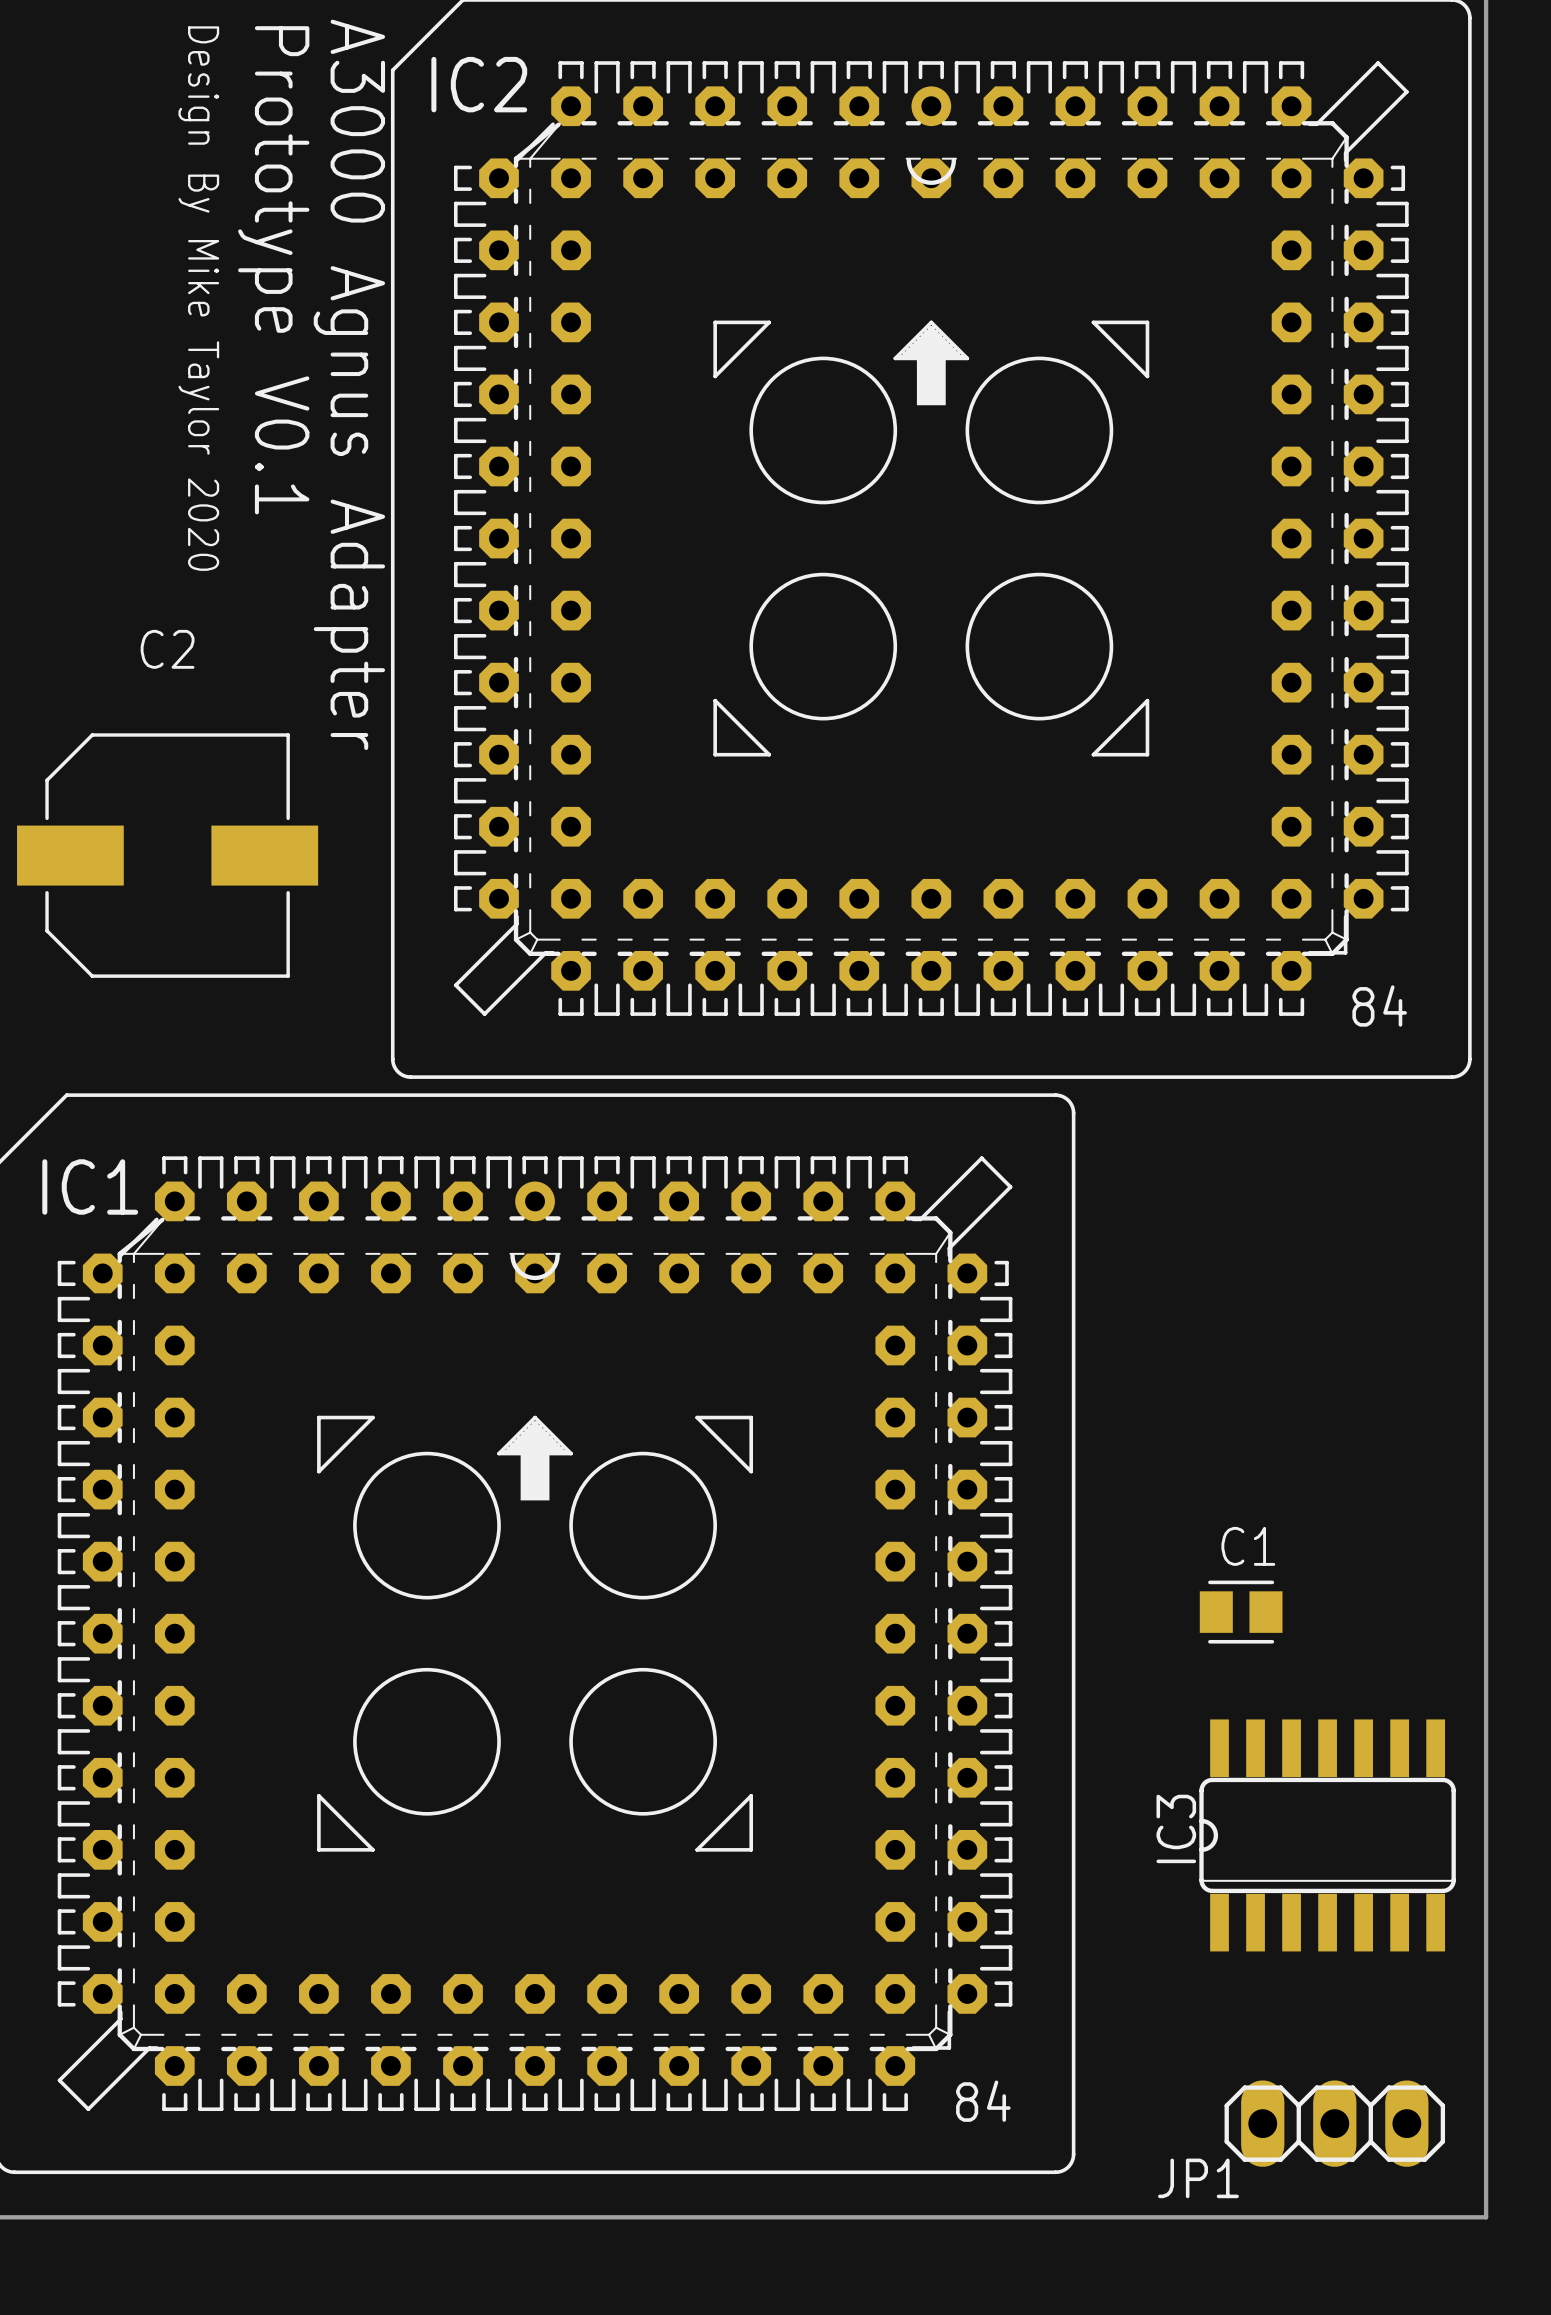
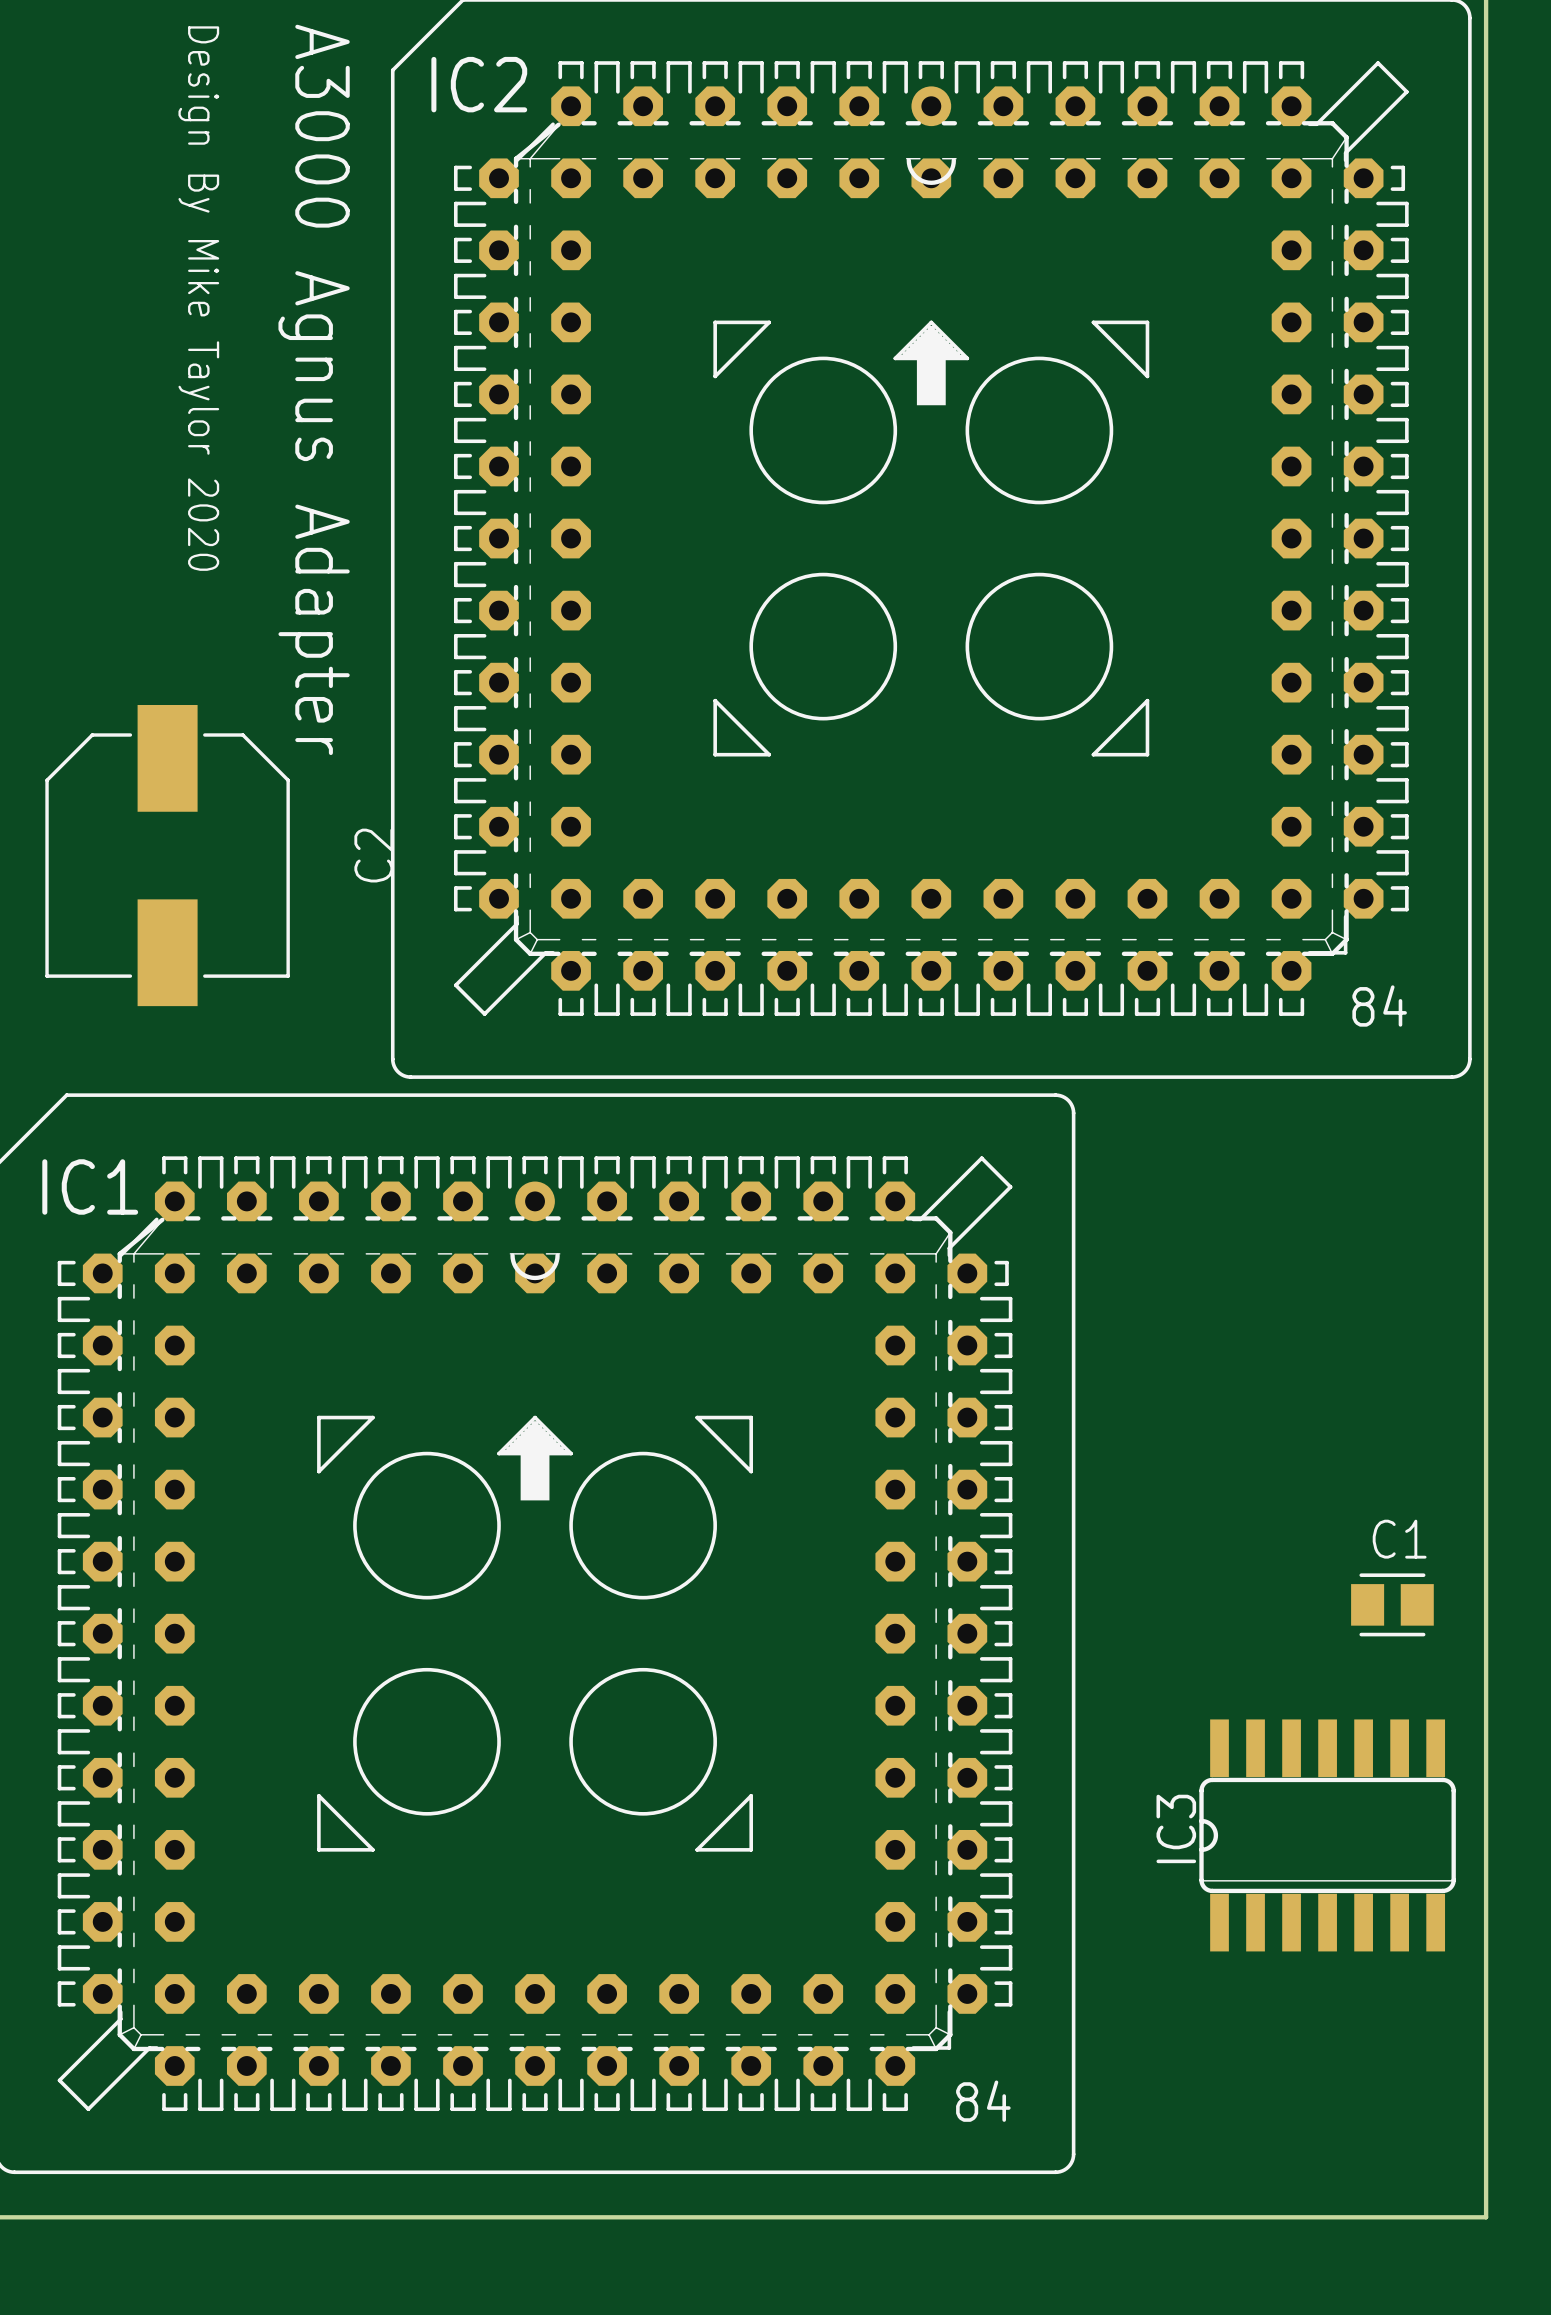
text: Prototype V0.1 (273, 270) -> none
text position: A3000 Agnus Adapter (349, 384) -> A3000 Agnus Adapter (314, 389)
C2 rotation: 0° (167, 855) -> 90° clockwise (167, 855)
C1 position: (1241, 1612) -> (1392, 1604)
JP1: (1334, 2123) -> none

